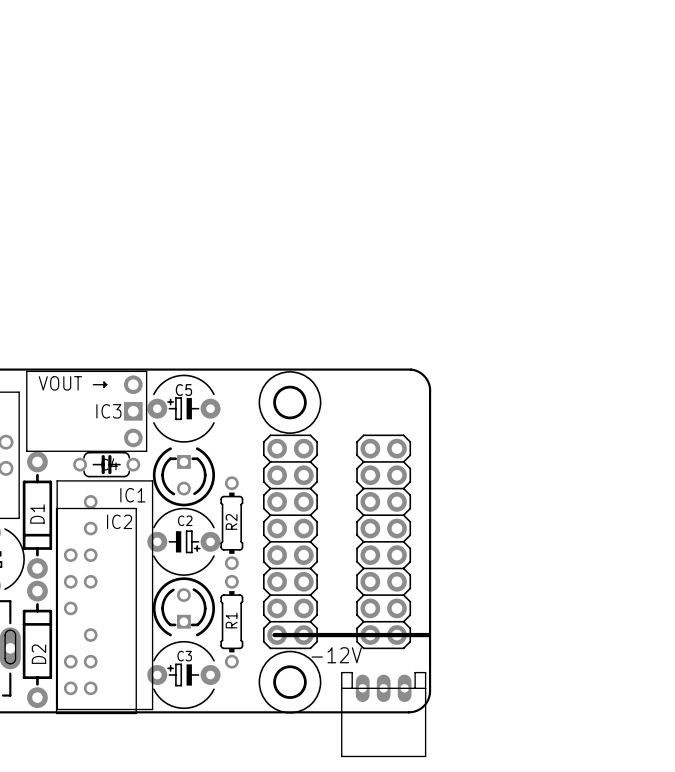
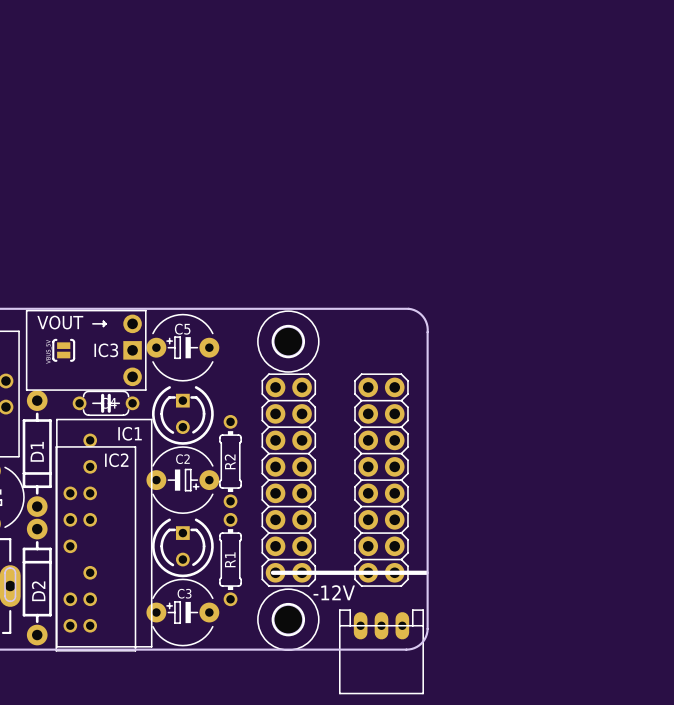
part: none -> (63, 350)
part rotation: 0° (183, 606) -> 180° (182, 547)

